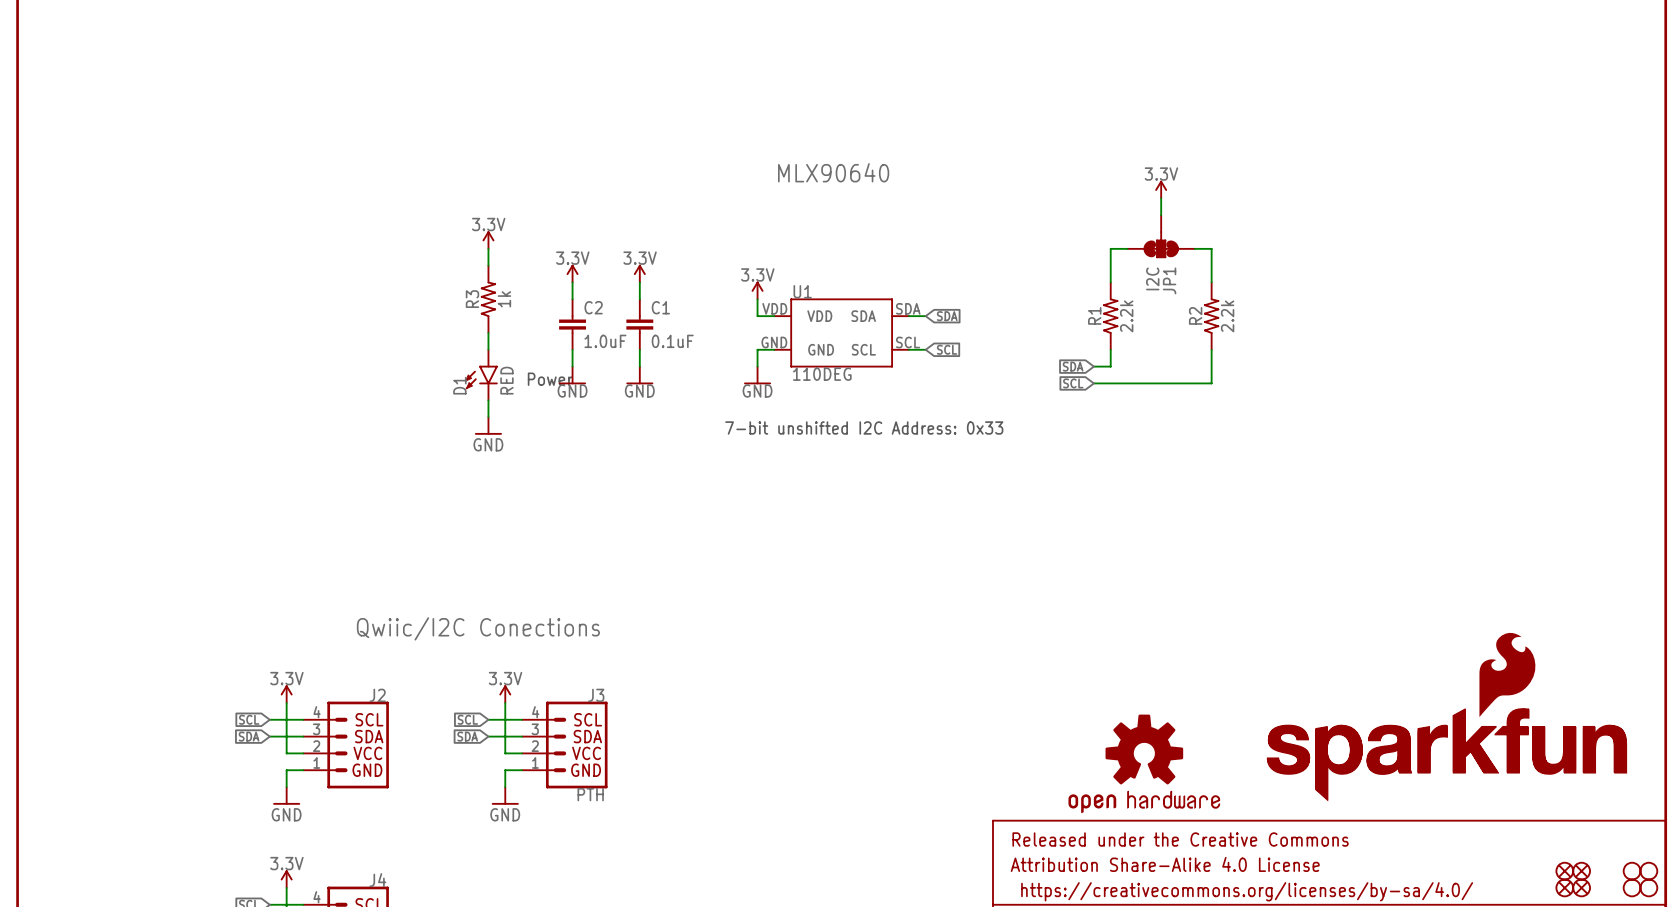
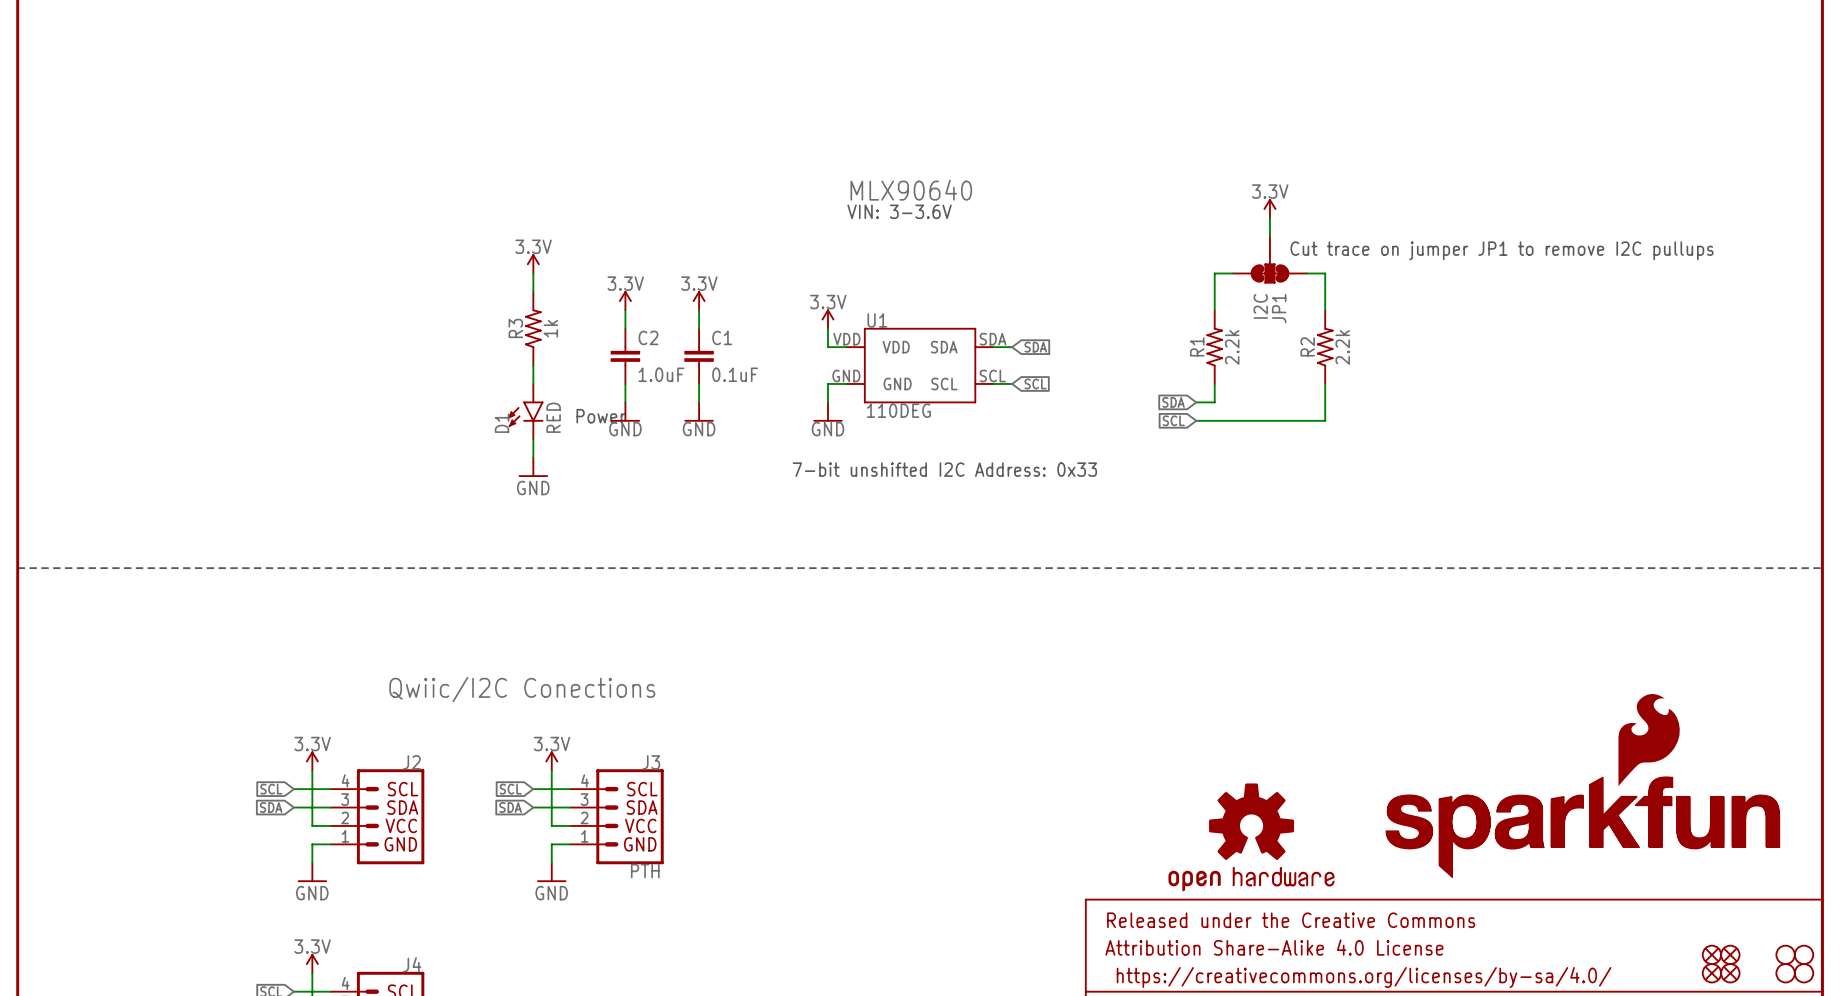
text: none -> VIN: 3-3.6V (899, 211)
text: none -> Cut trace on jumper JP1 to remove I2C pullups (1502, 250)
line: none -> (17, 568) (1822, 568)

